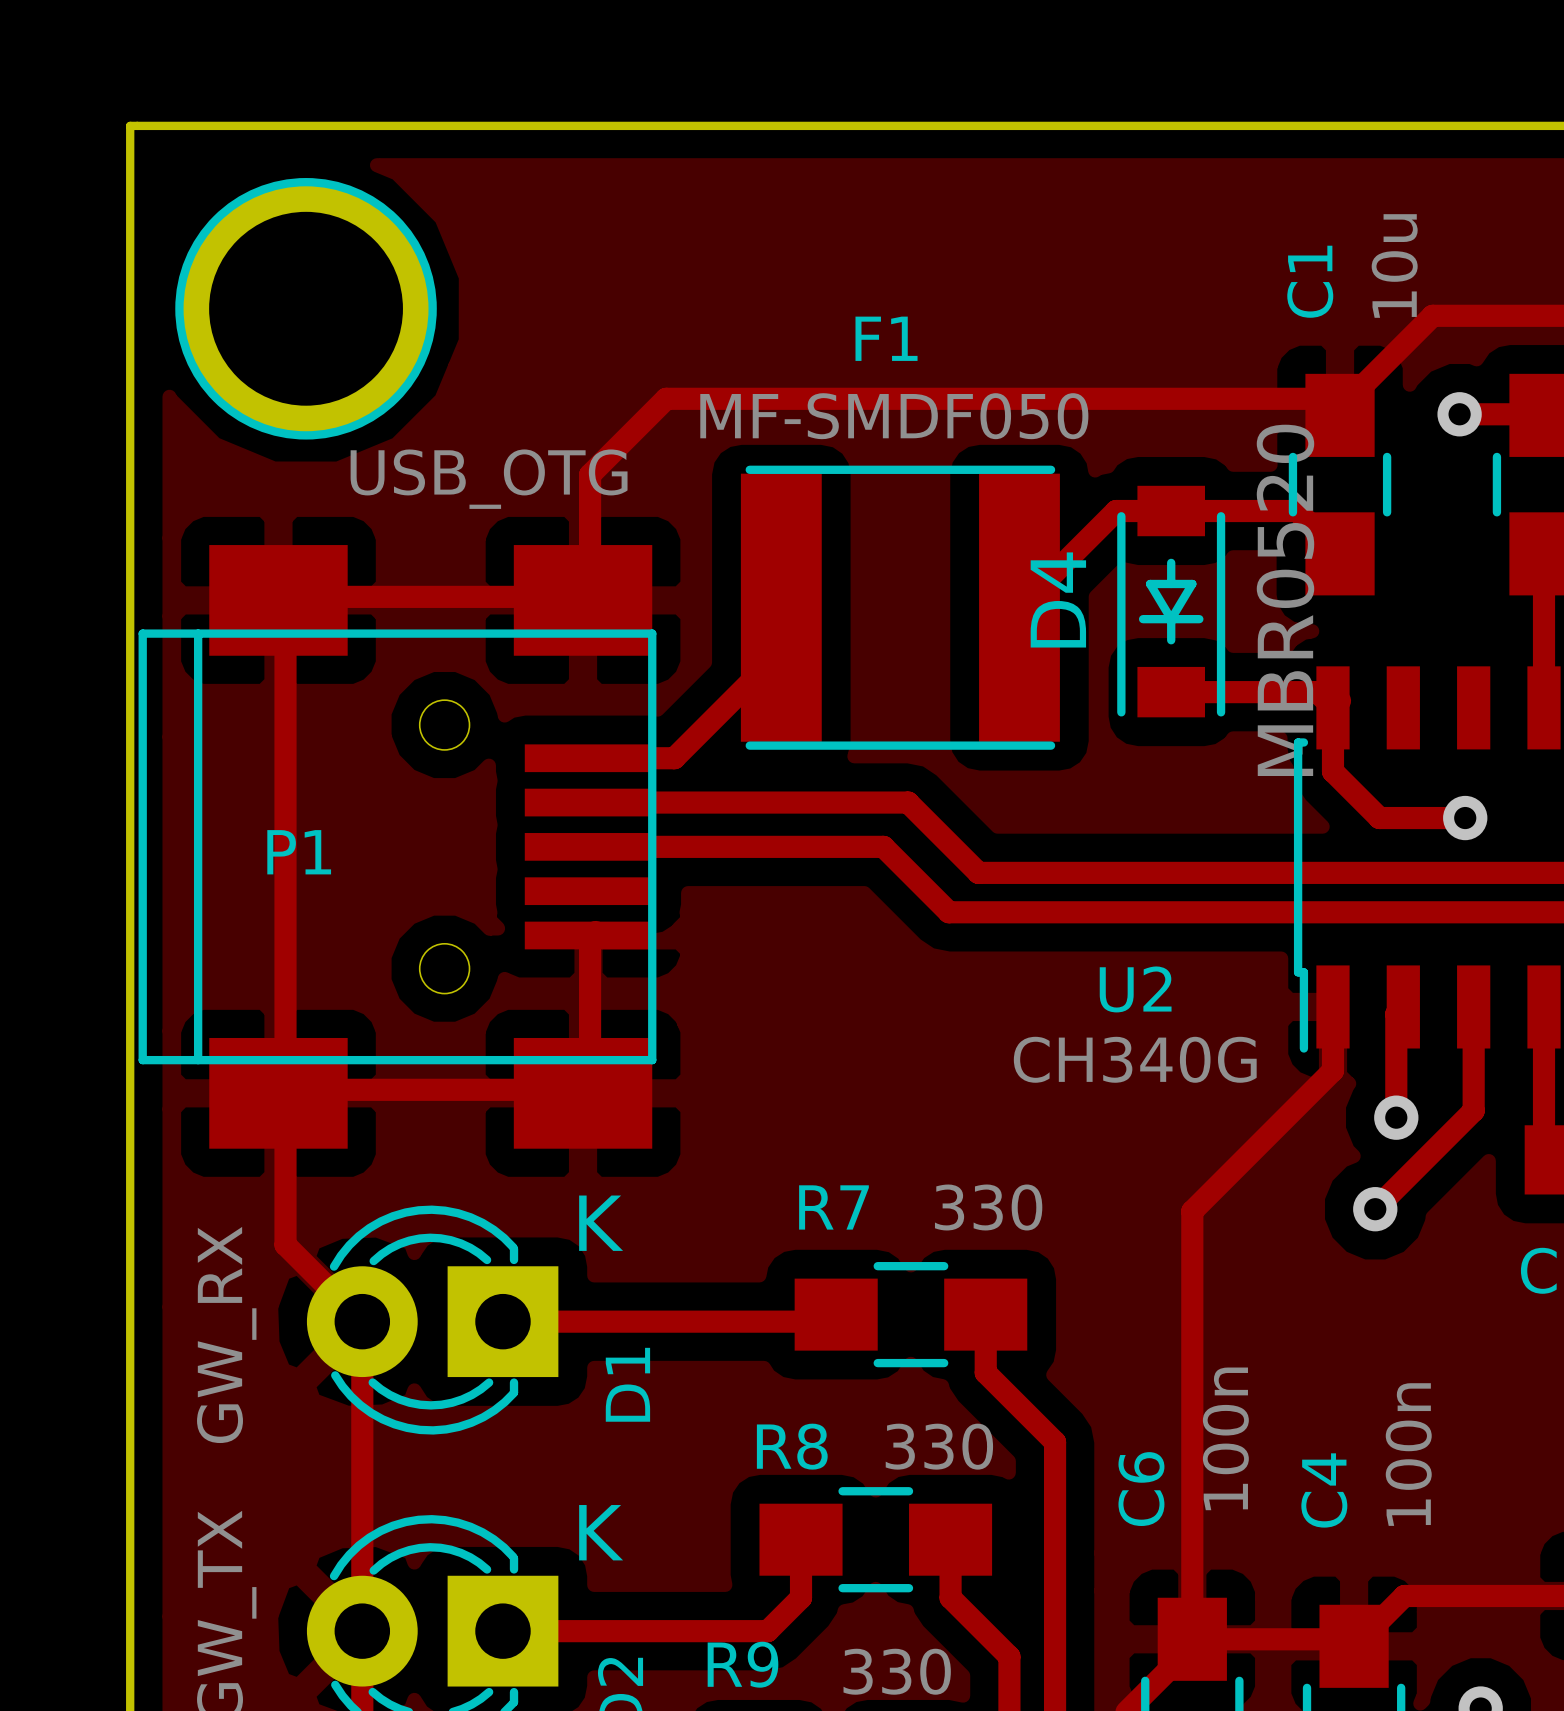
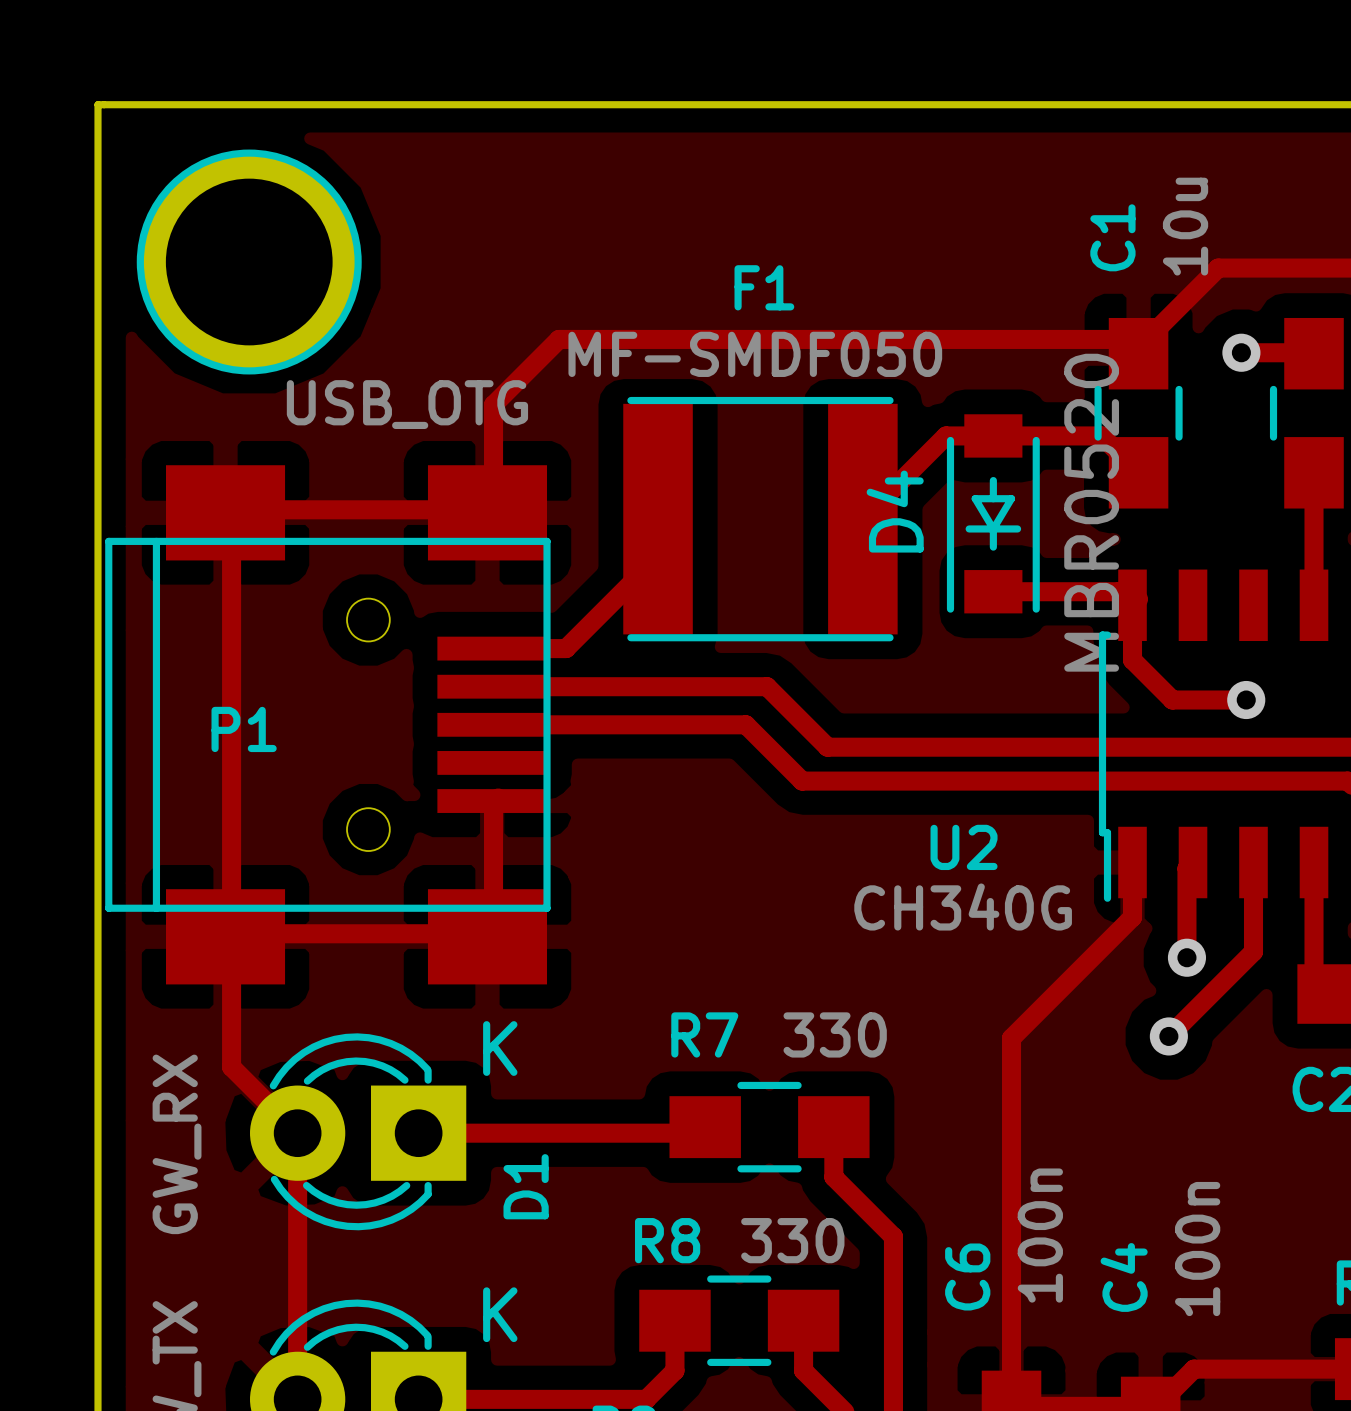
F1 name position: F1 (886, 338) -> F1 (764, 287)

